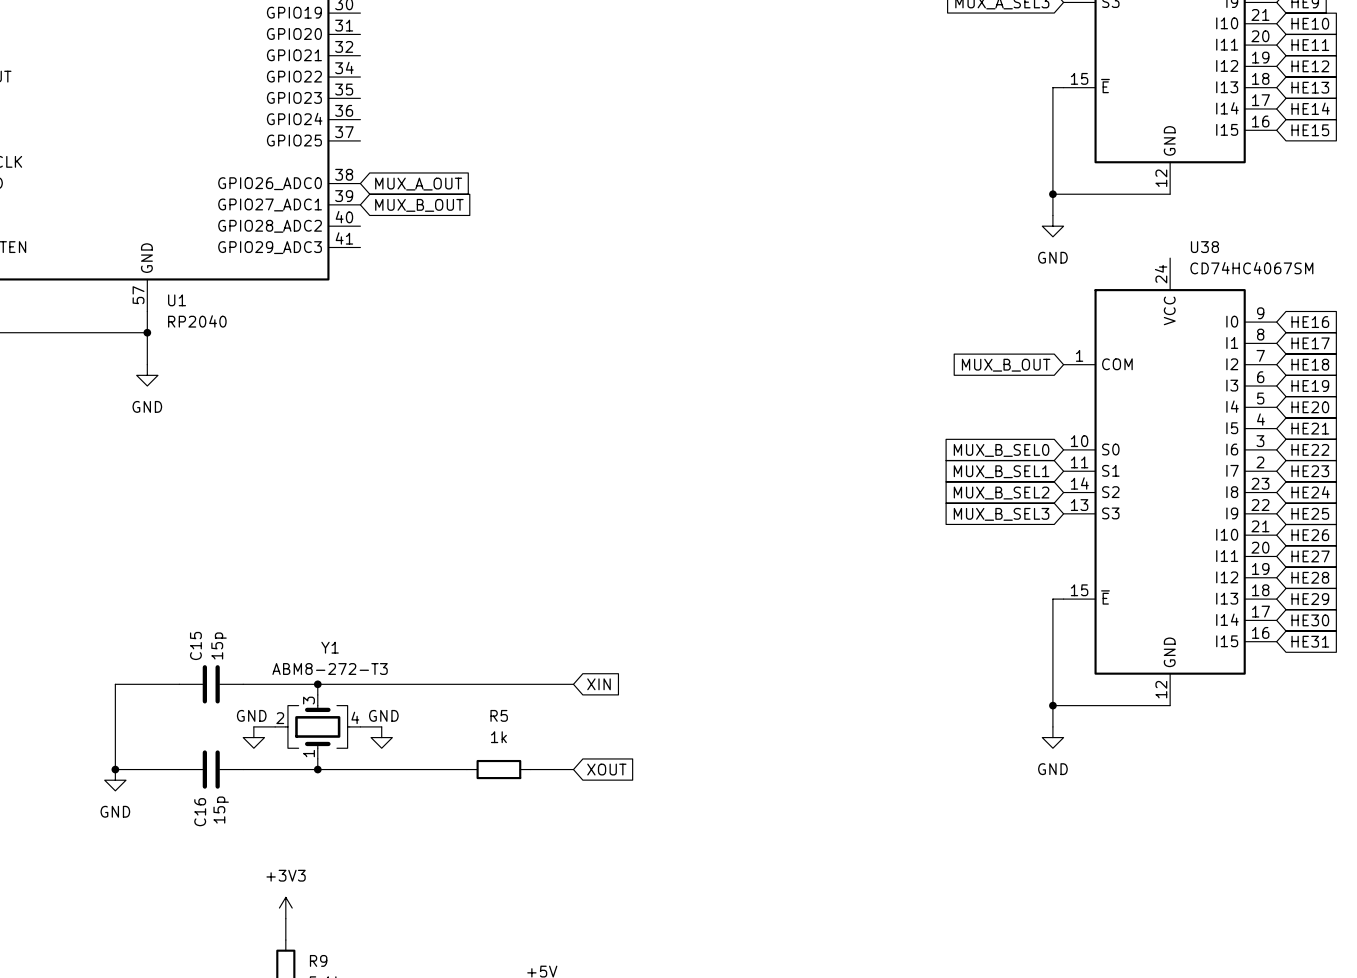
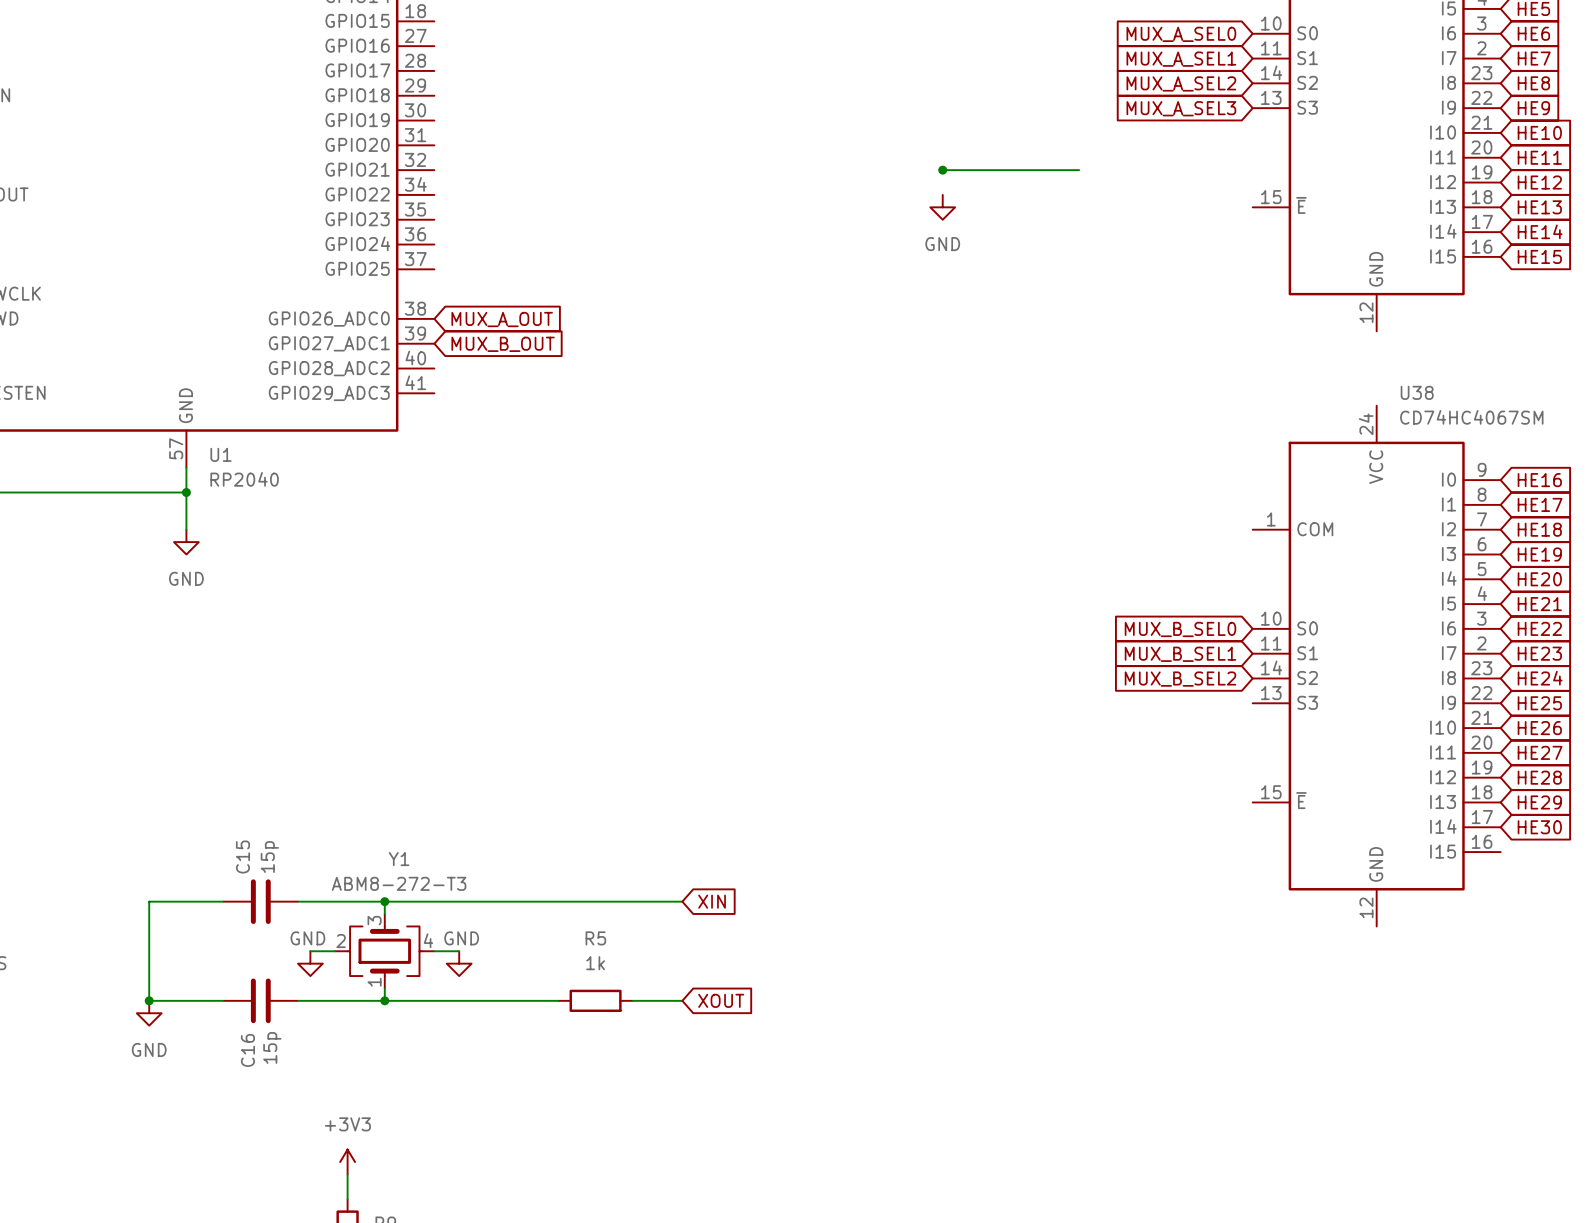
wire: none -> (942, 170) (1079, 170)
junction: none -> (942, 170)
power symbol: none -> GND (942, 207)
wire: (1063, 87) (1052, 87) (1052, 215) -> none
wire: (1052, 194) (1170, 194) -> none
junction: (1052, 194) -> none
power symbol: GND (1052, 226) -> none
global label: MUX_B_OUT (1006, 365) -> none
global label: MUX_B_SEL3 (1001, 514) -> none
wire: (1063, 599) (1052, 599) (1052, 726) -> none
global label: HE31 (1310, 641) -> none
wire: (1052, 705) (1170, 705) -> none
junction: (1052, 705) -> none
power symbol: GND (1052, 737) -> none

